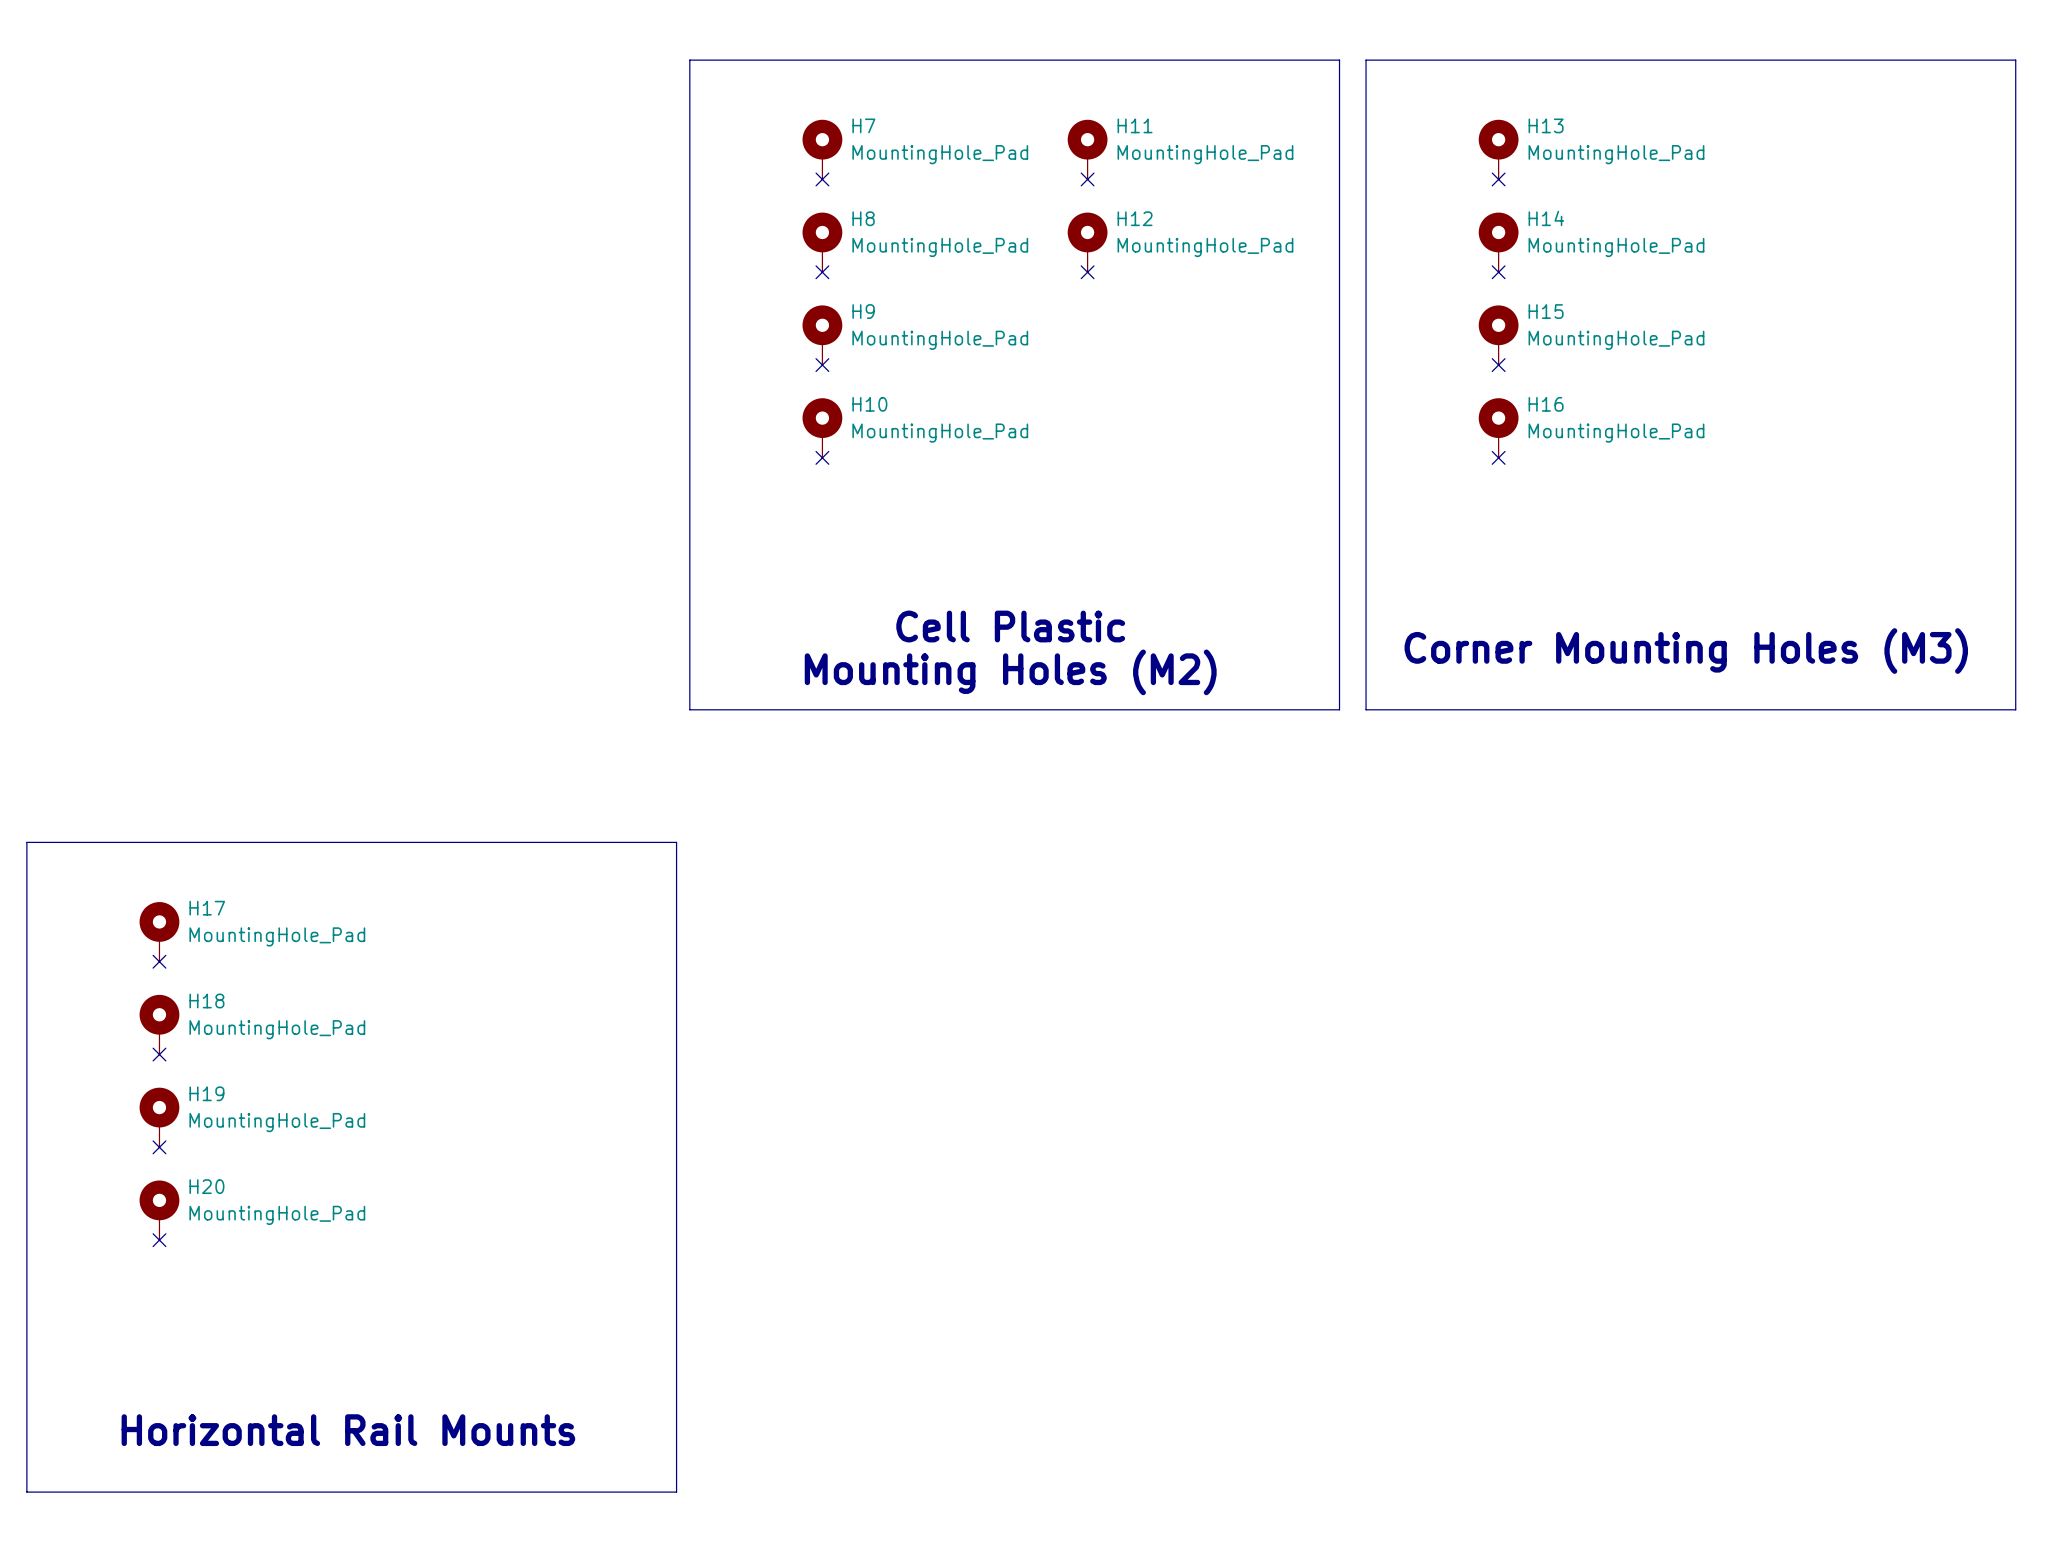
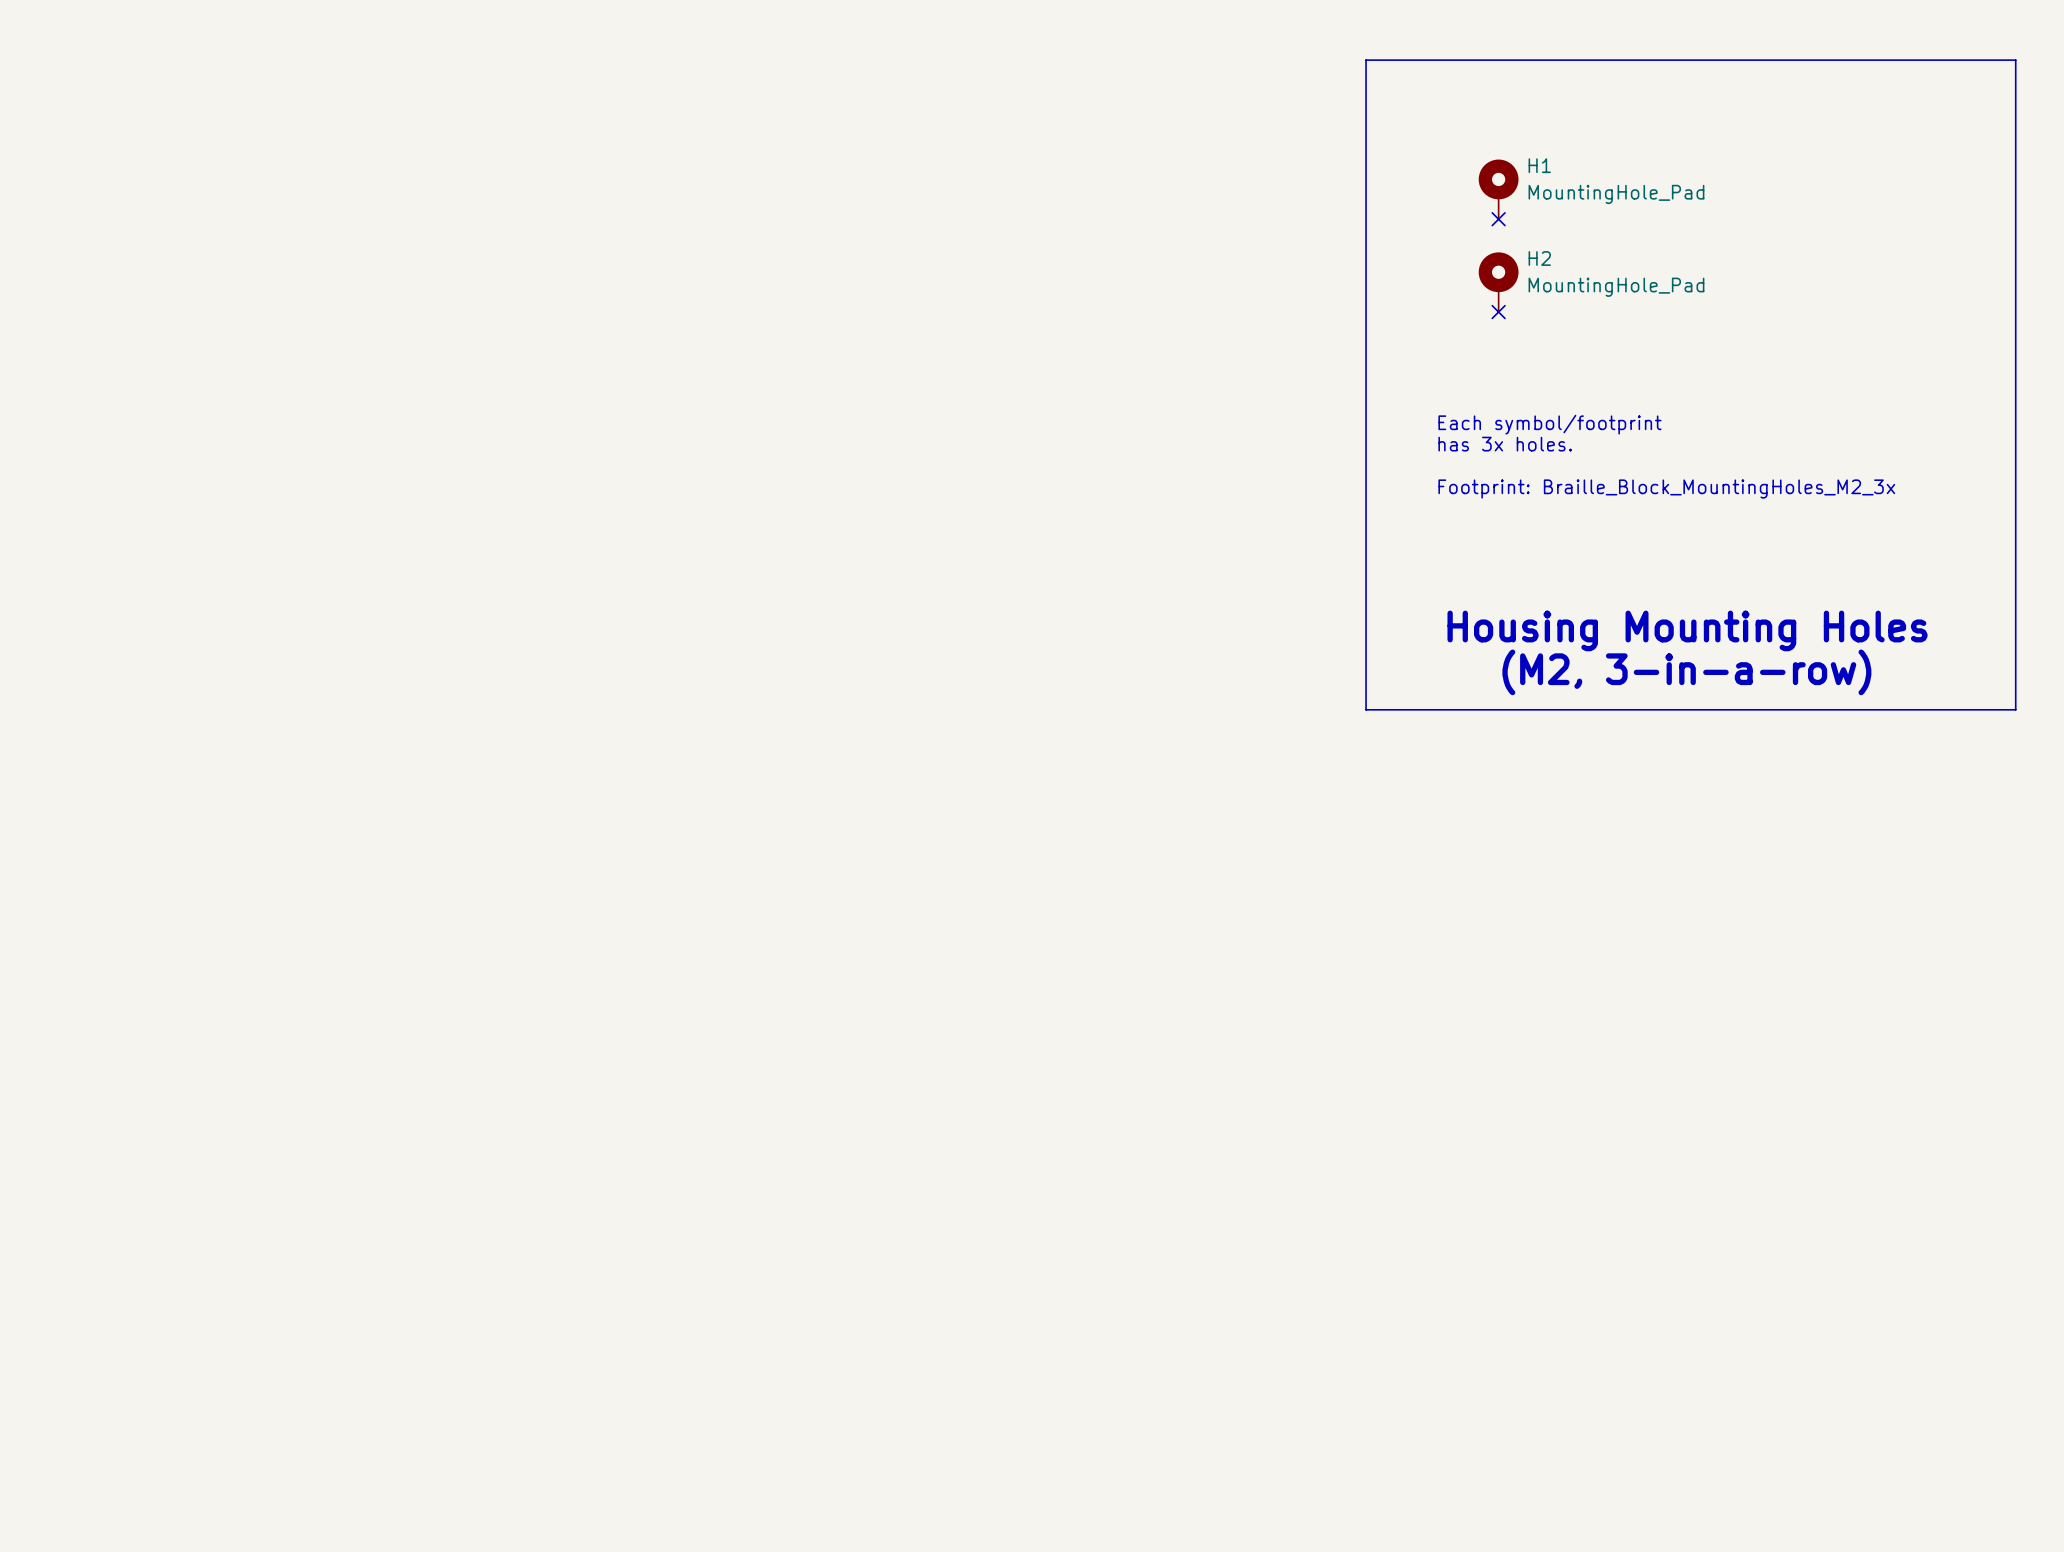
line: (689, 60) (1339, 60) (1339, 709) (689, 709) (689, 60) -> none
H7: MountingHole_Pad (822, 149) -> none
H11: MountingHole_Pad (1087, 149) -> none
H13: MountingHole_Pad (1498, 149) -> none
no-connect mark: (822, 179) -> none
no-connect mark: (1087, 179) -> none
no-connect mark: (1498, 179) -> none
H1: none -> MountingHole_Pad (1498, 189)
no-connect mark: none -> (1498, 219)
H8: MountingHole_Pad (822, 242) -> none
H12: MountingHole_Pad (1087, 242) -> none
H14: MountingHole_Pad (1498, 242) -> none
no-connect mark: (822, 272) -> none
no-connect mark: (1087, 272) -> none
no-connect mark: (1498, 272) -> none
H2: none -> MountingHole_Pad (1498, 282)
no-connect mark: none -> (1498, 312)
H9: MountingHole_Pad (822, 335) -> none
H15: MountingHole_Pad (1498, 335) -> none
no-connect mark: (822, 365) -> none
no-connect mark: (1498, 365) -> none
text: none -> Each symbol/footprint (1549, 424)
H10: MountingHole_Pad (822, 428) -> none
H16: MountingHole_Pad (1498, 428) -> none
text: none -> has 3x holes. (1505, 444)
no-connect mark: (822, 457) -> none
no-connect mark: (1498, 457) -> none
text: none -> Footprint: Braille_Block_MountingHoles_M2_3x (1666, 489)
text: Cell Plastic (1010, 626) -> none
text: Corner Mounting Holes (M3) (1686, 651) -> Housing Mounting Holes (1687, 630)
text: Mounting Holes (M2) (1010, 672) -> none
text: none -> (M2, 3-in-a-row) (1686, 672)
line: (26, 842) (676, 842) (676, 1492) (26, 1492) (26, 842) -> none
H17: MountingHole_Pad (159, 931) -> none
no-connect mark: (159, 961) -> none
H18: MountingHole_Pad (159, 1024) -> none
no-connect mark: (159, 1054) -> none
H19: MountingHole_Pad (159, 1117) -> none
no-connect mark: (159, 1147) -> none
H20: MountingHole_Pad (159, 1210) -> none
no-connect mark: (159, 1240) -> none
text: Horizontal Rail Mounts (348, 1430) -> none

